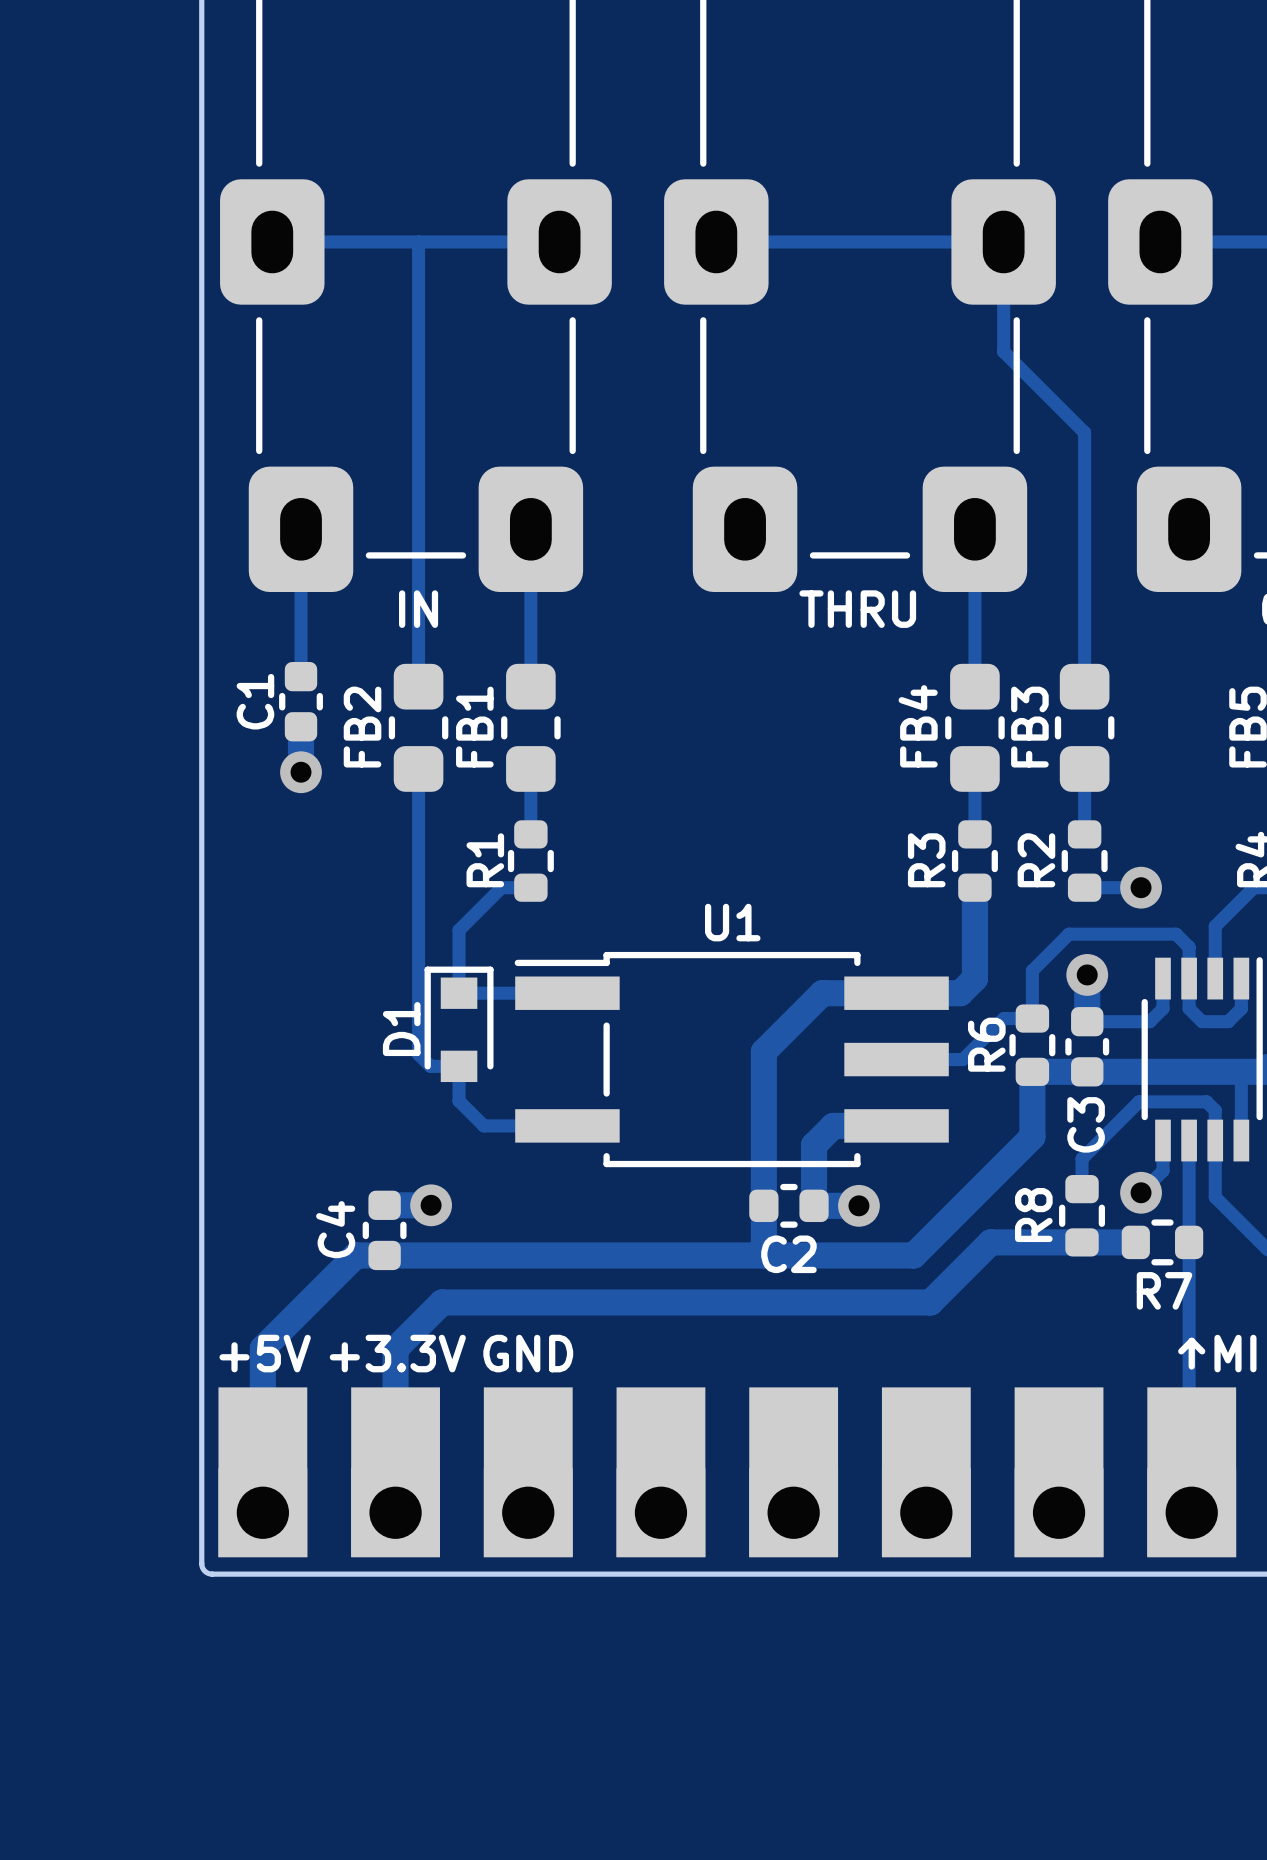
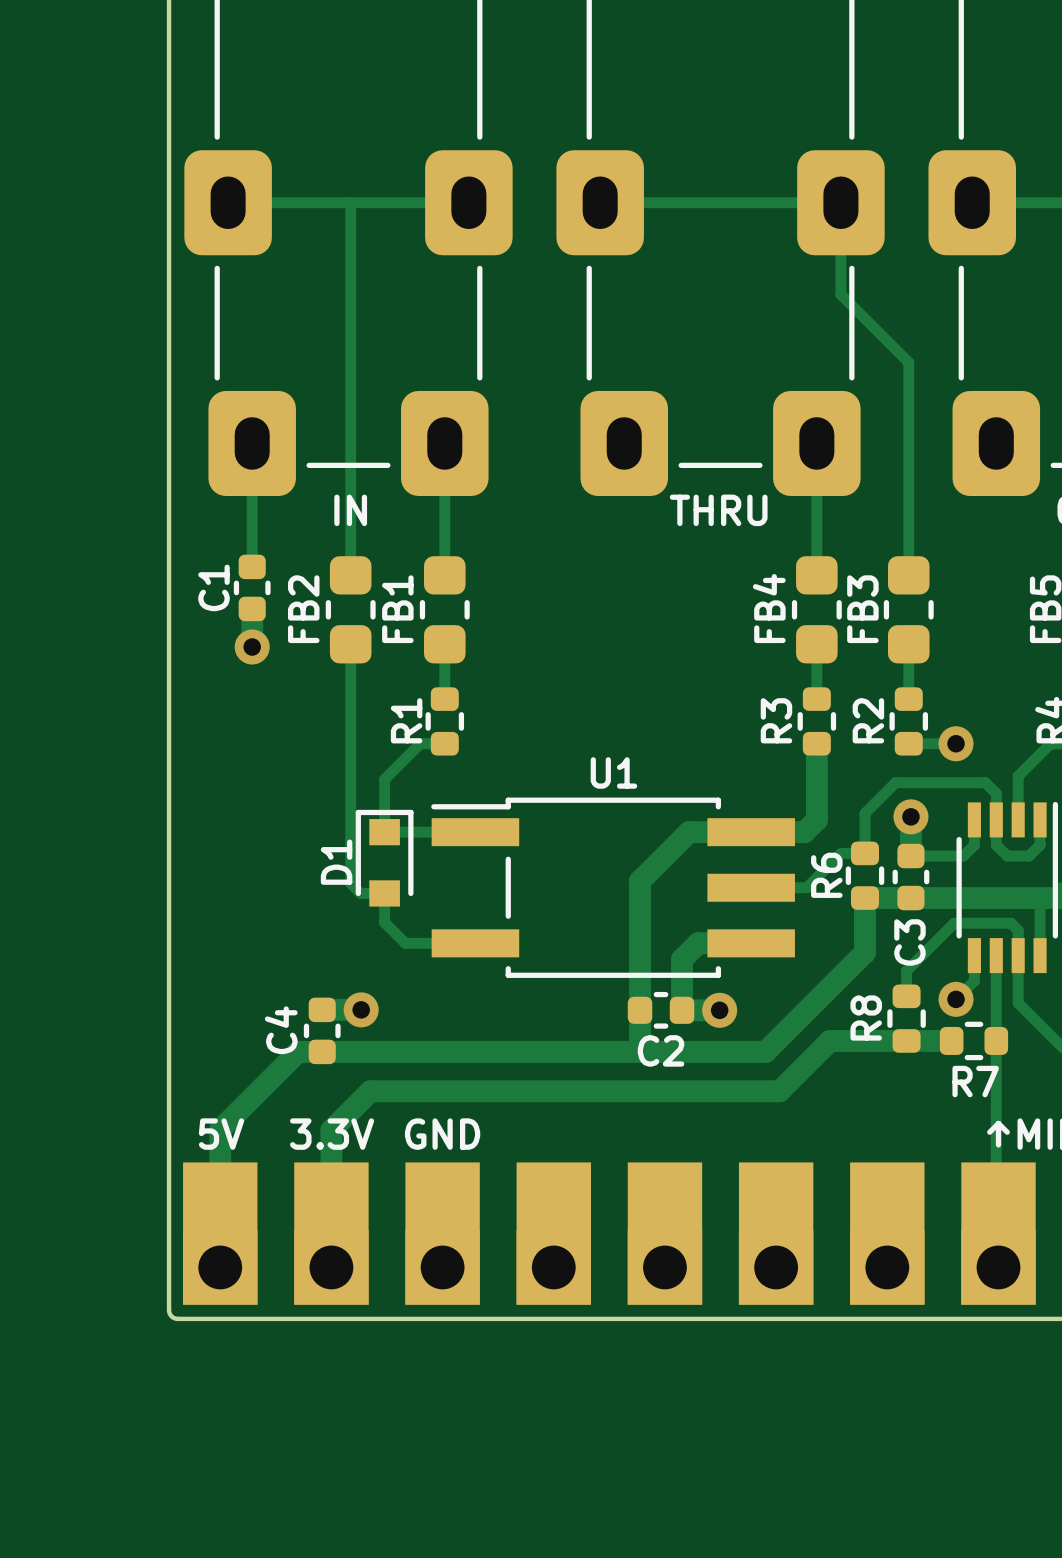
text: +5V (265, 1353) -> 5V (221, 1134)
text: +3.3V (397, 1353) -> 3.3V (332, 1134)

